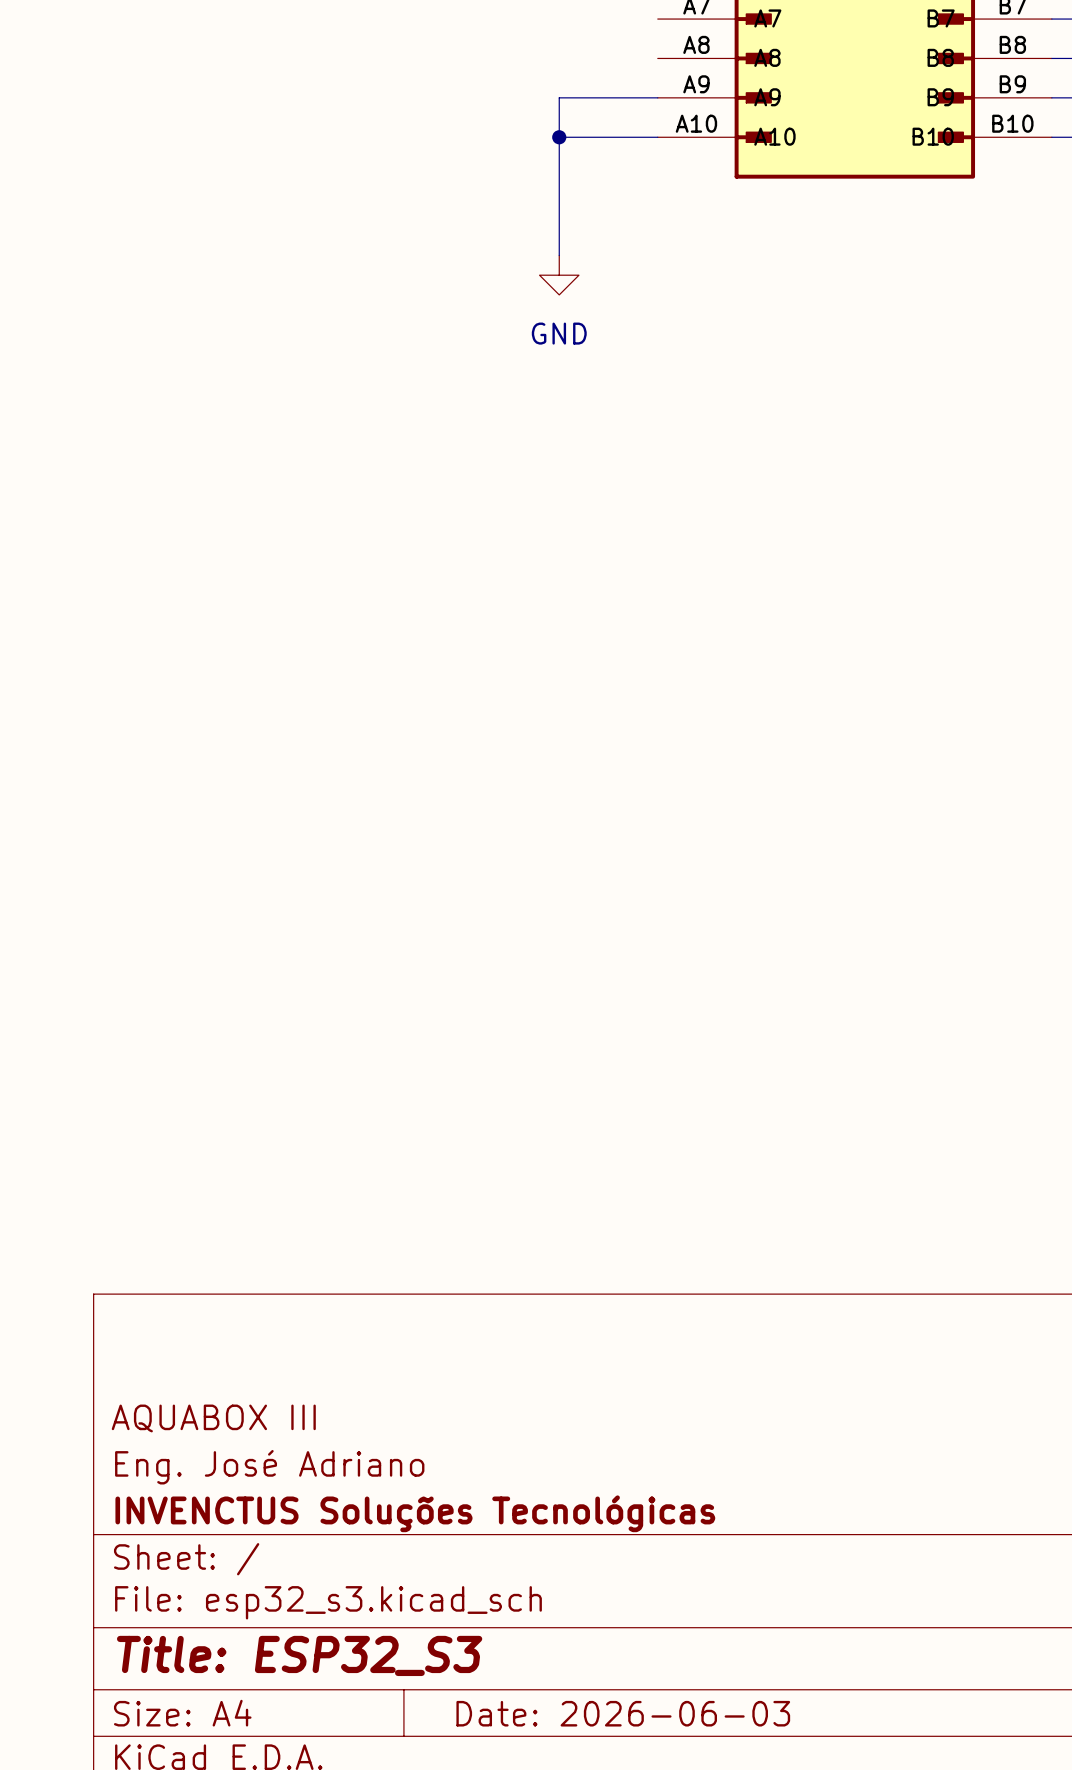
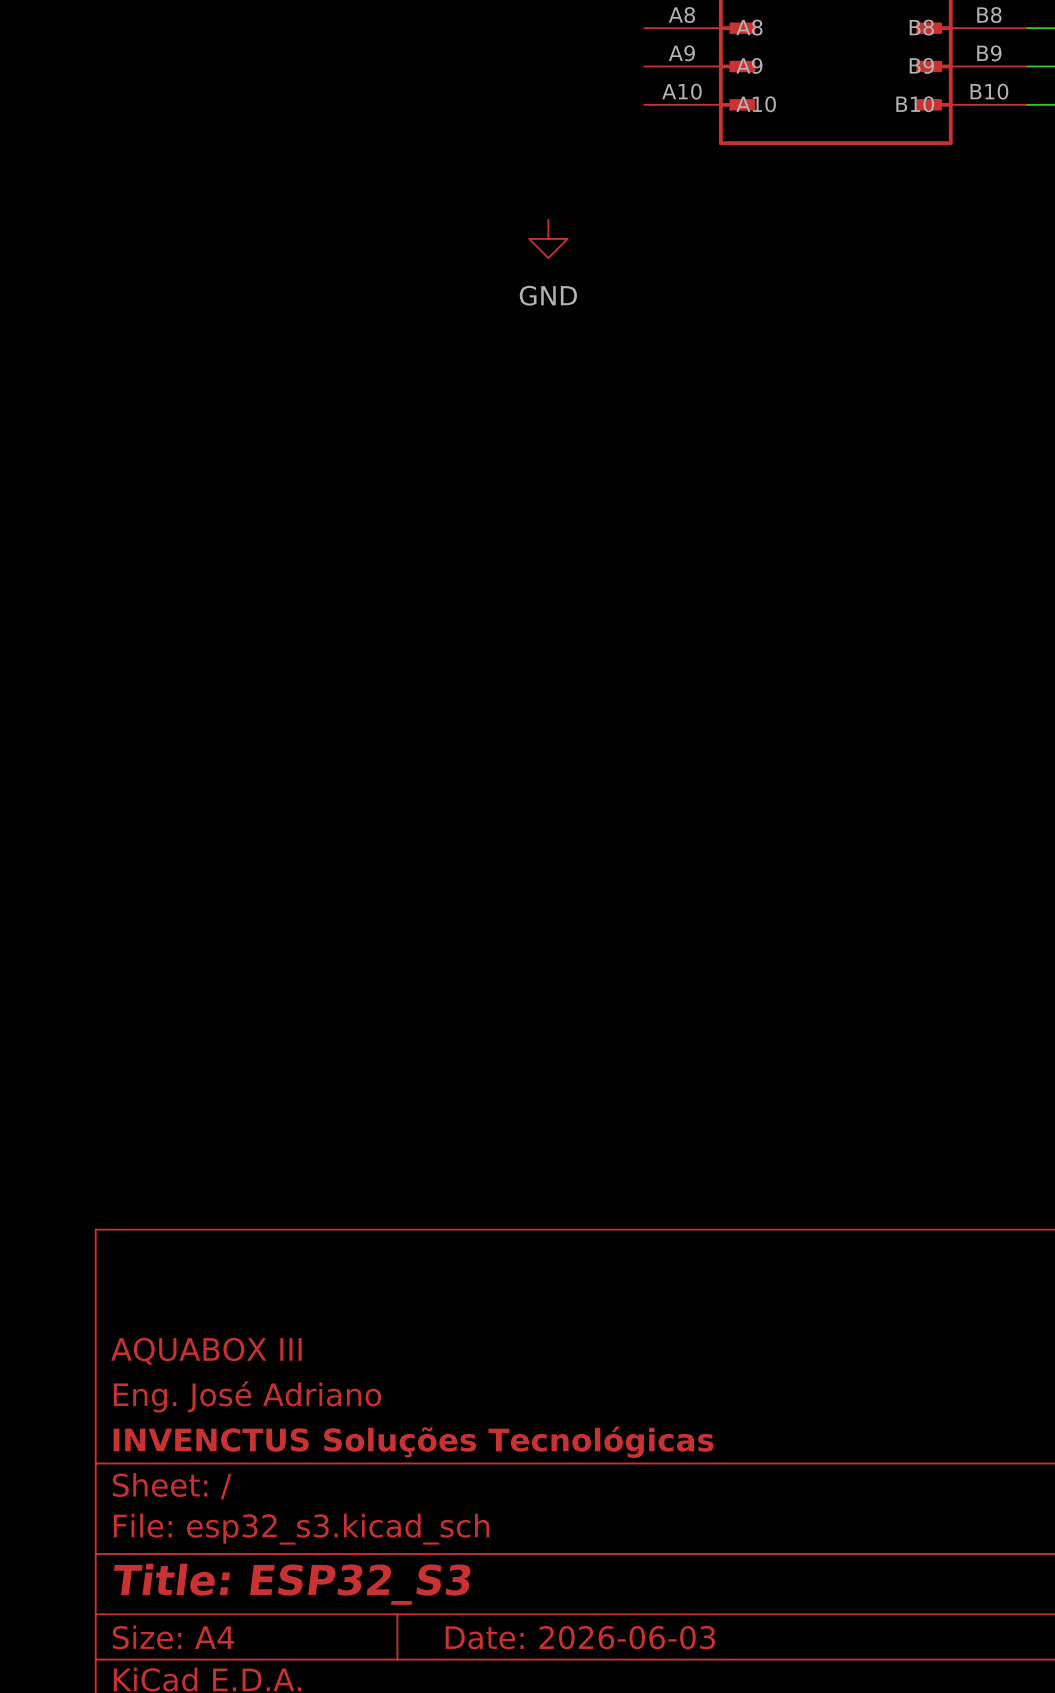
wire: (657, 97) (559, 97) (559, 255) -> none
wire: (559, 137) (657, 137) -> none
junction: (559, 137) -> none

